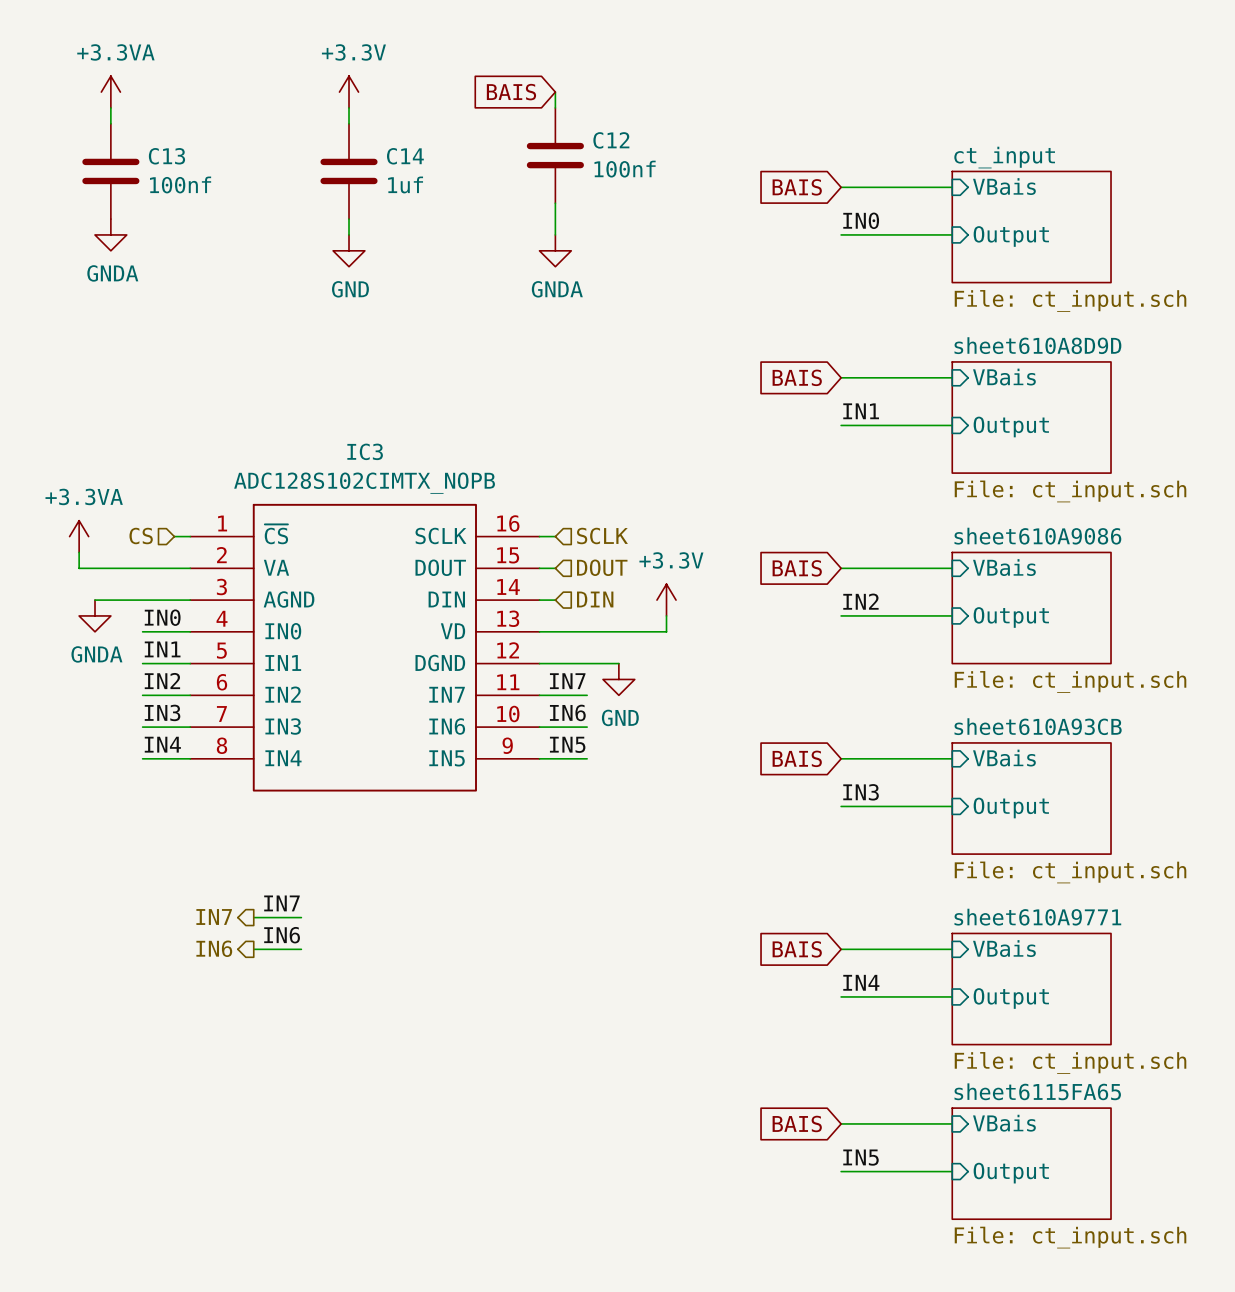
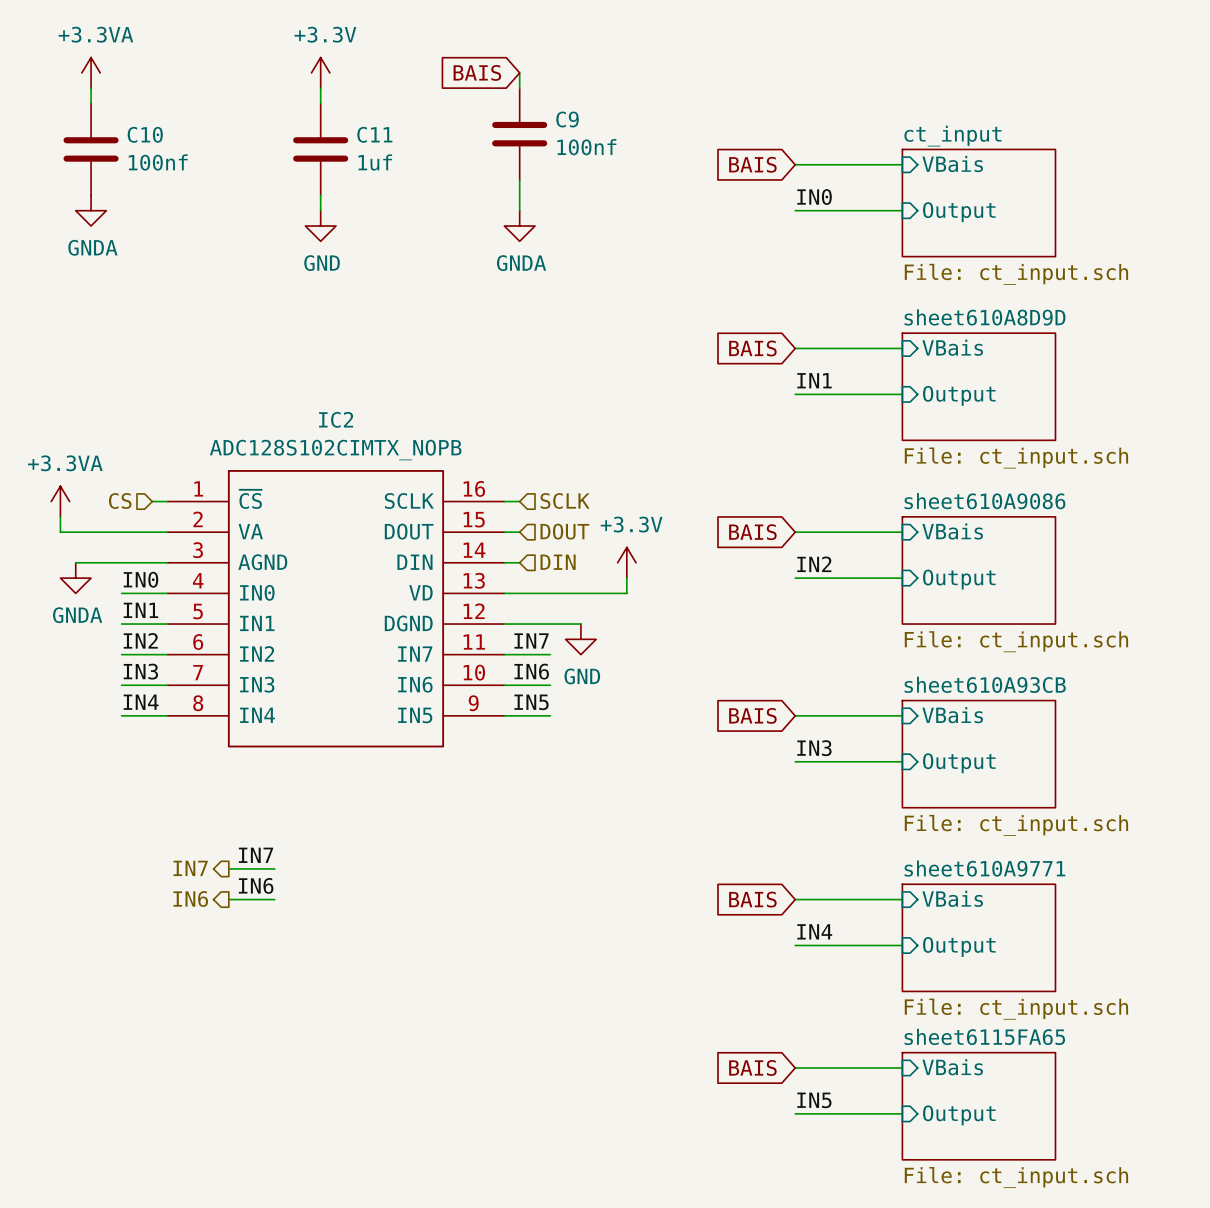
C12 name: C12 (611, 140) -> C9 (567, 119)
C13 name: C13 (166, 156) -> C10 (145, 134)
C14 name: C14 (405, 156) -> C11 (374, 134)
IC3 name: IC3 (365, 451) -> IC2 (336, 419)

